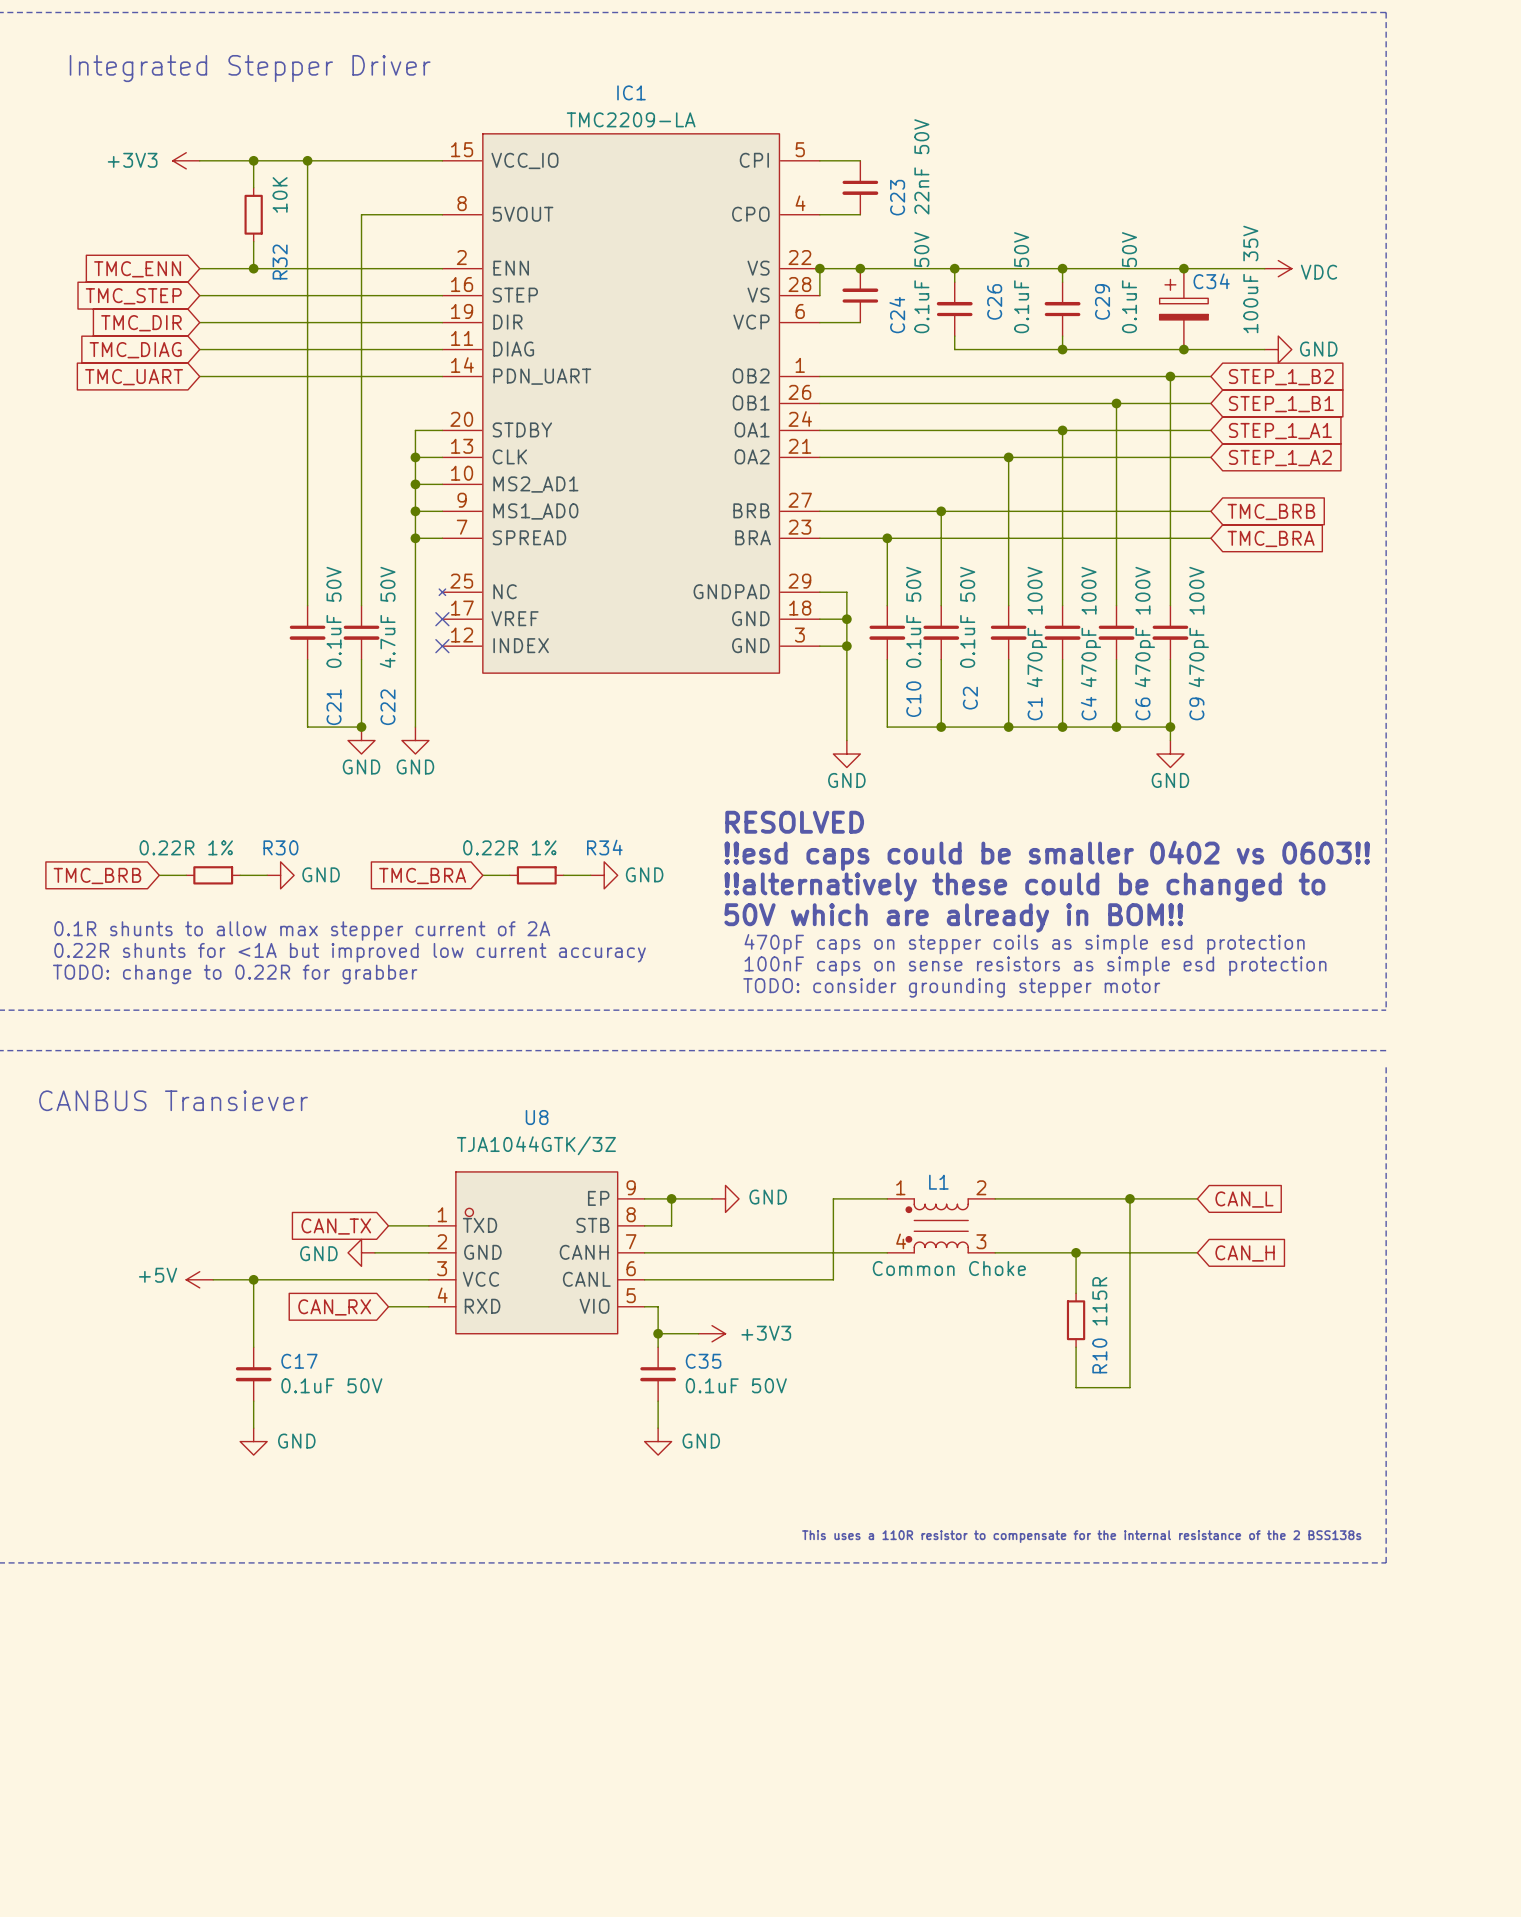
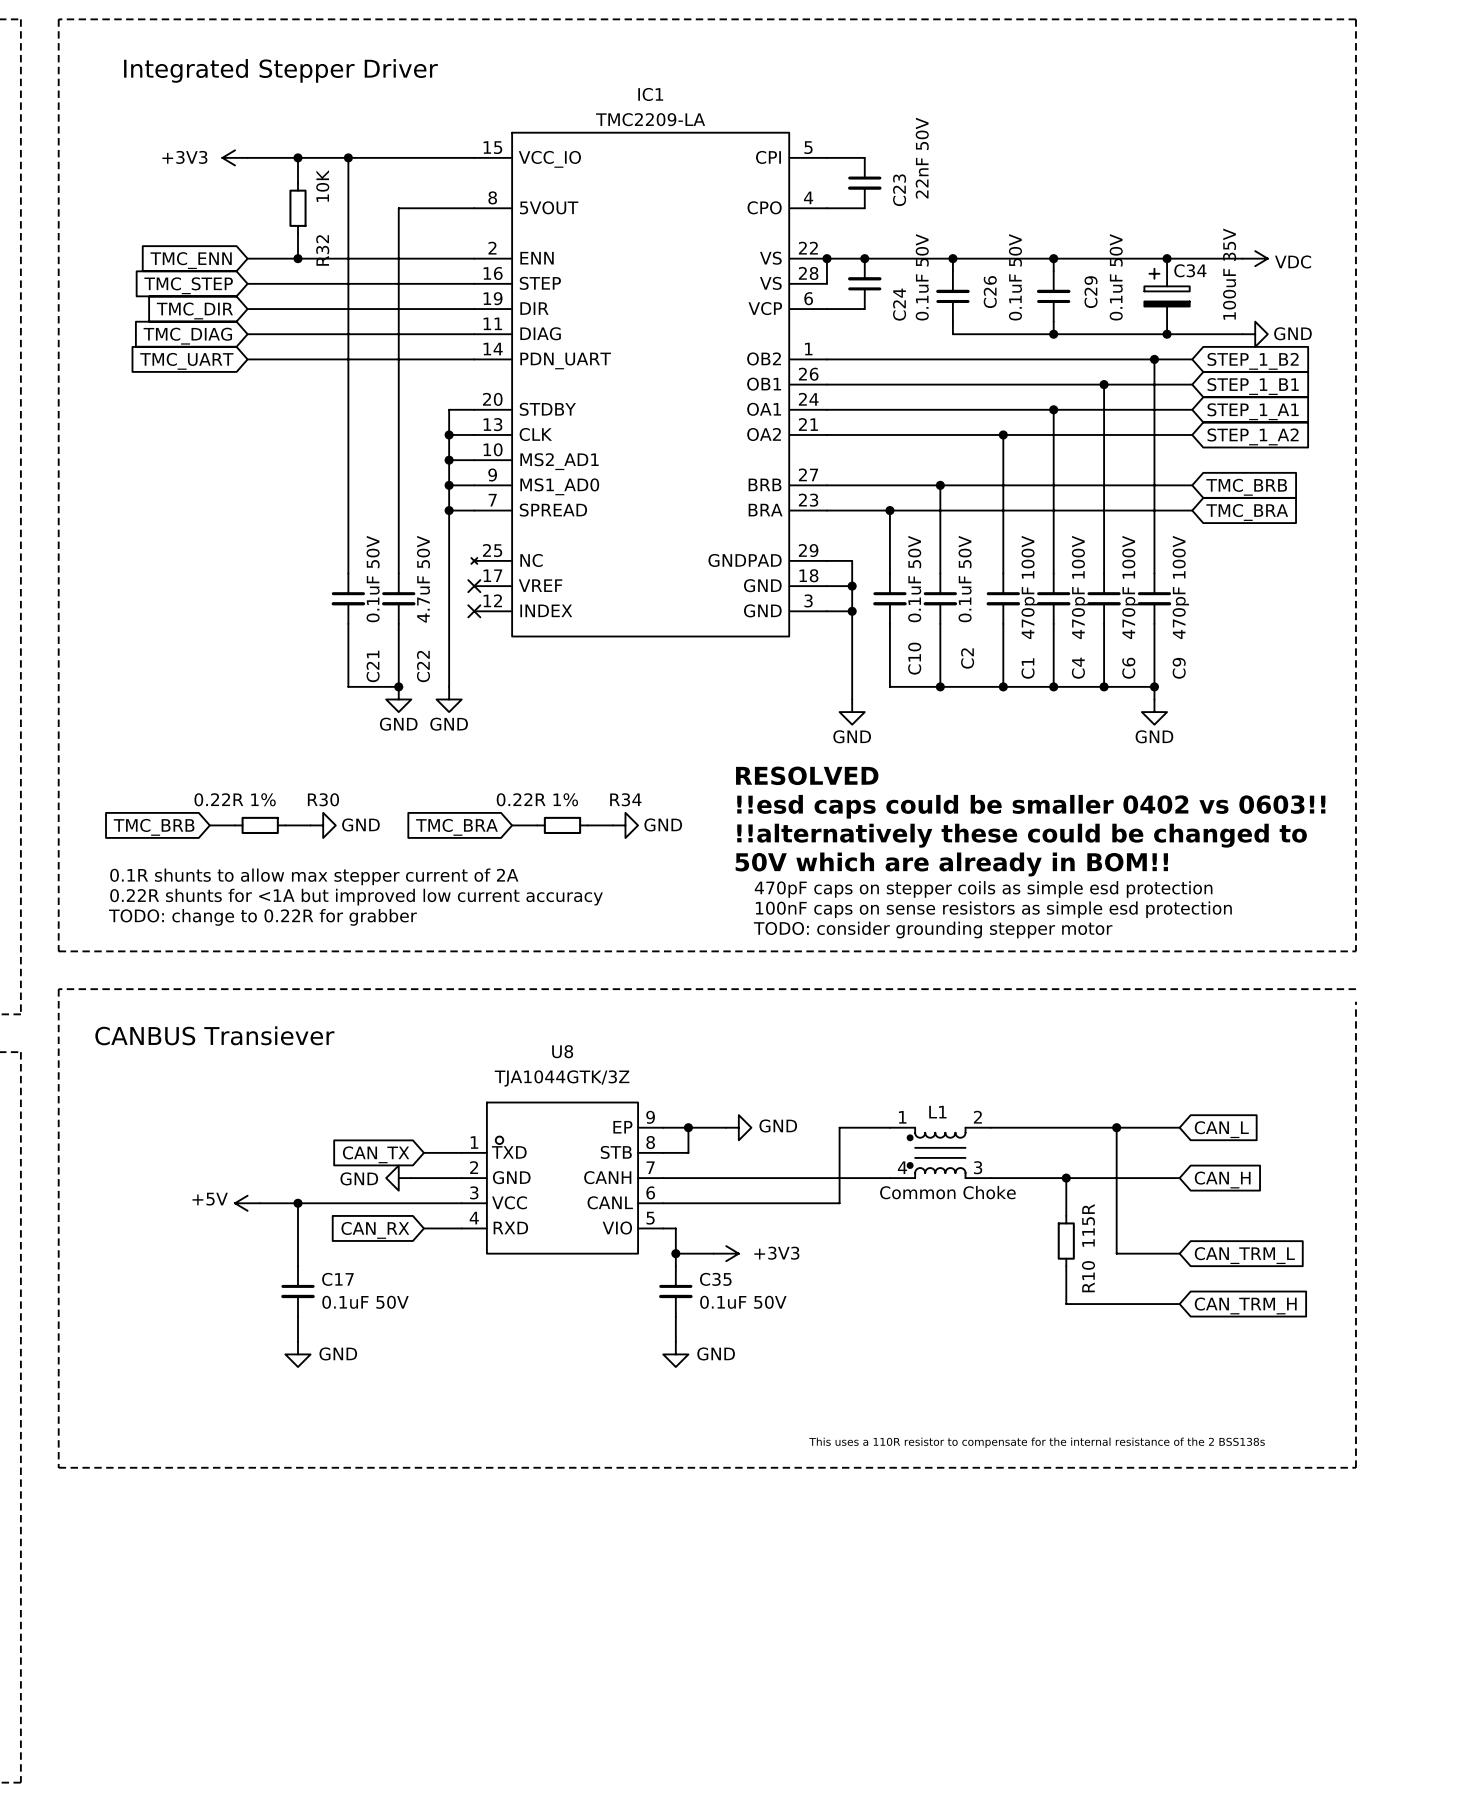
wire: (1129, 1333) (1129, 1387) -> (1116, 1253) (1179, 1253)
global label: none -> CAN_TRM_L (1244, 1255)
wire: none -> (1116, 1304) (1179, 1304)
global label: none -> CAN_TRM_H (1245, 1305)

